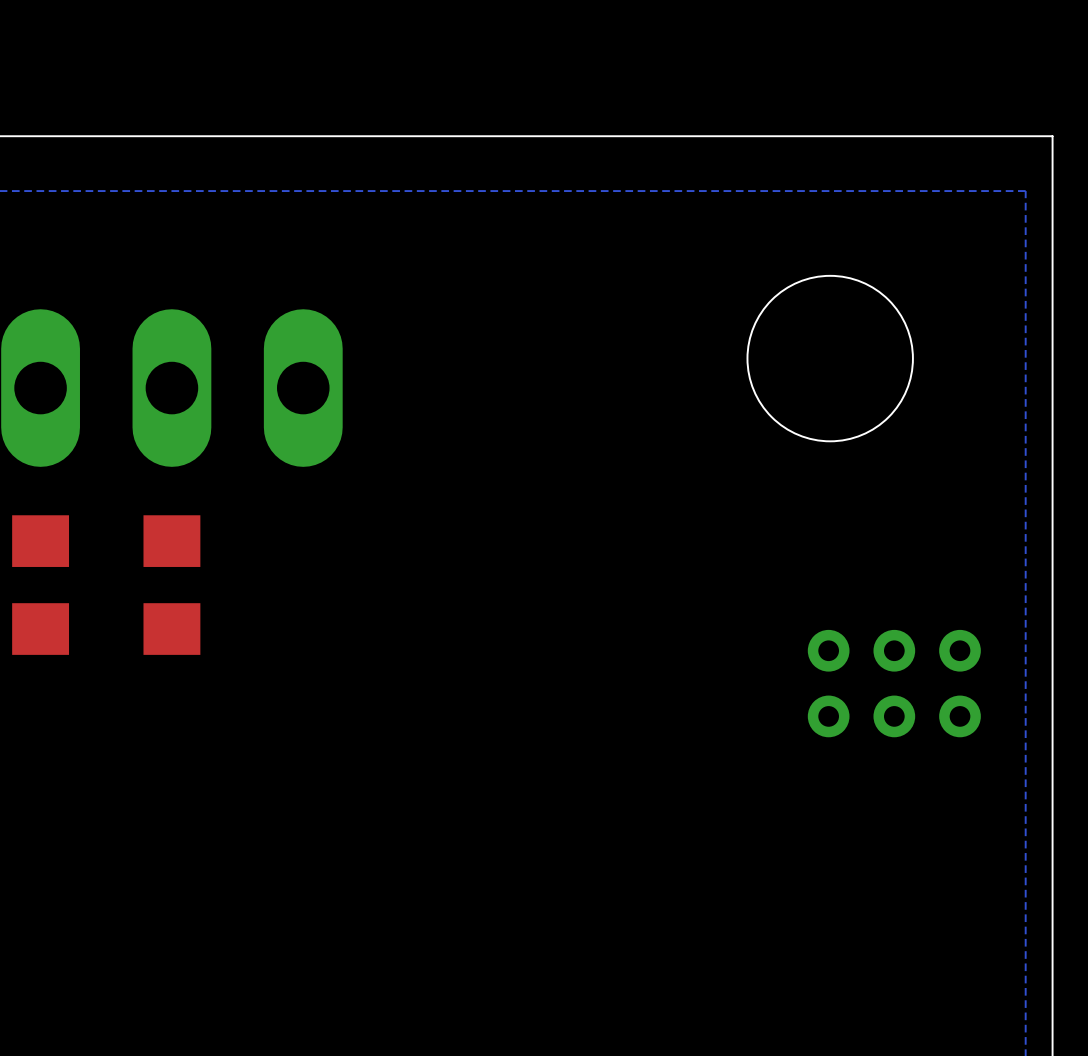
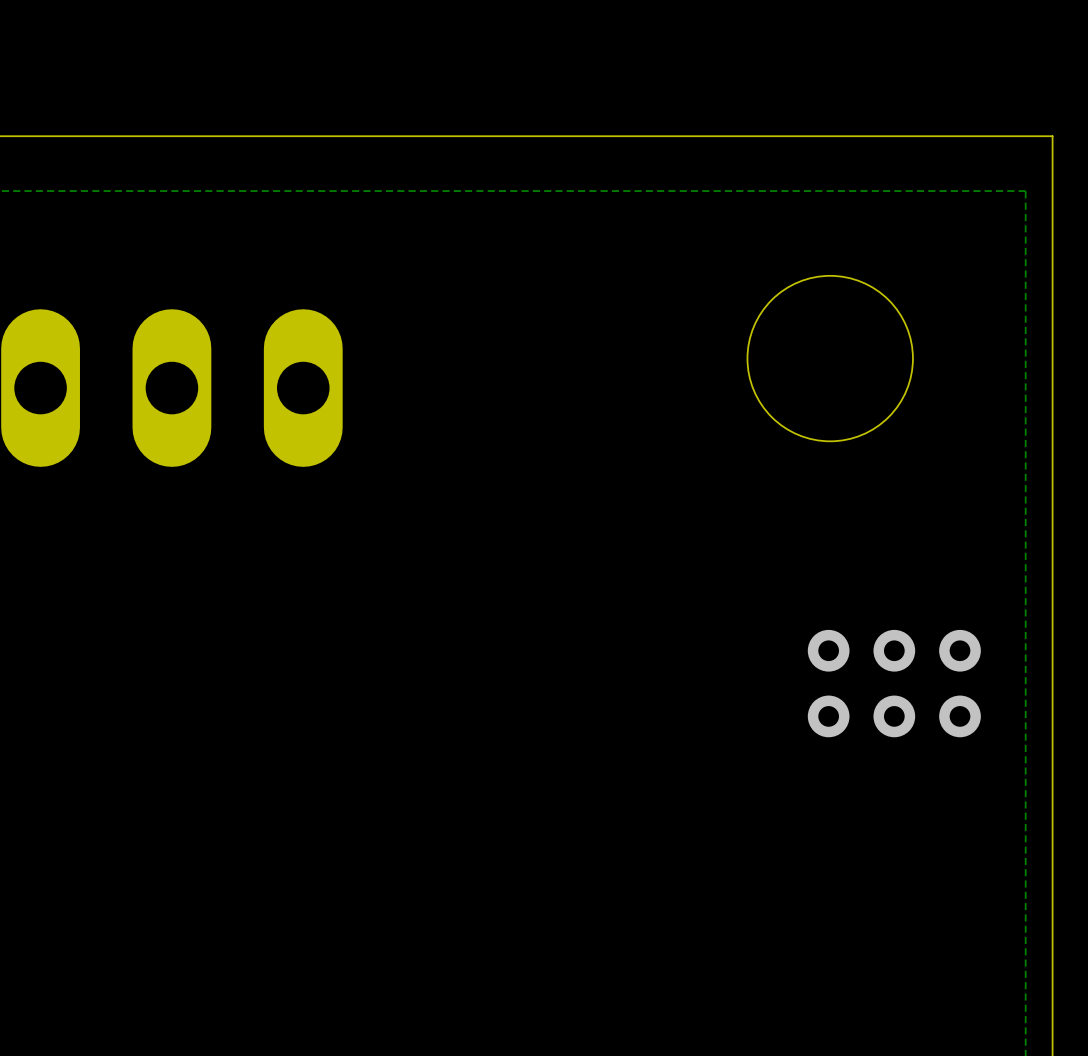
part: (40, 585) -> none
part: (171, 585) -> none

